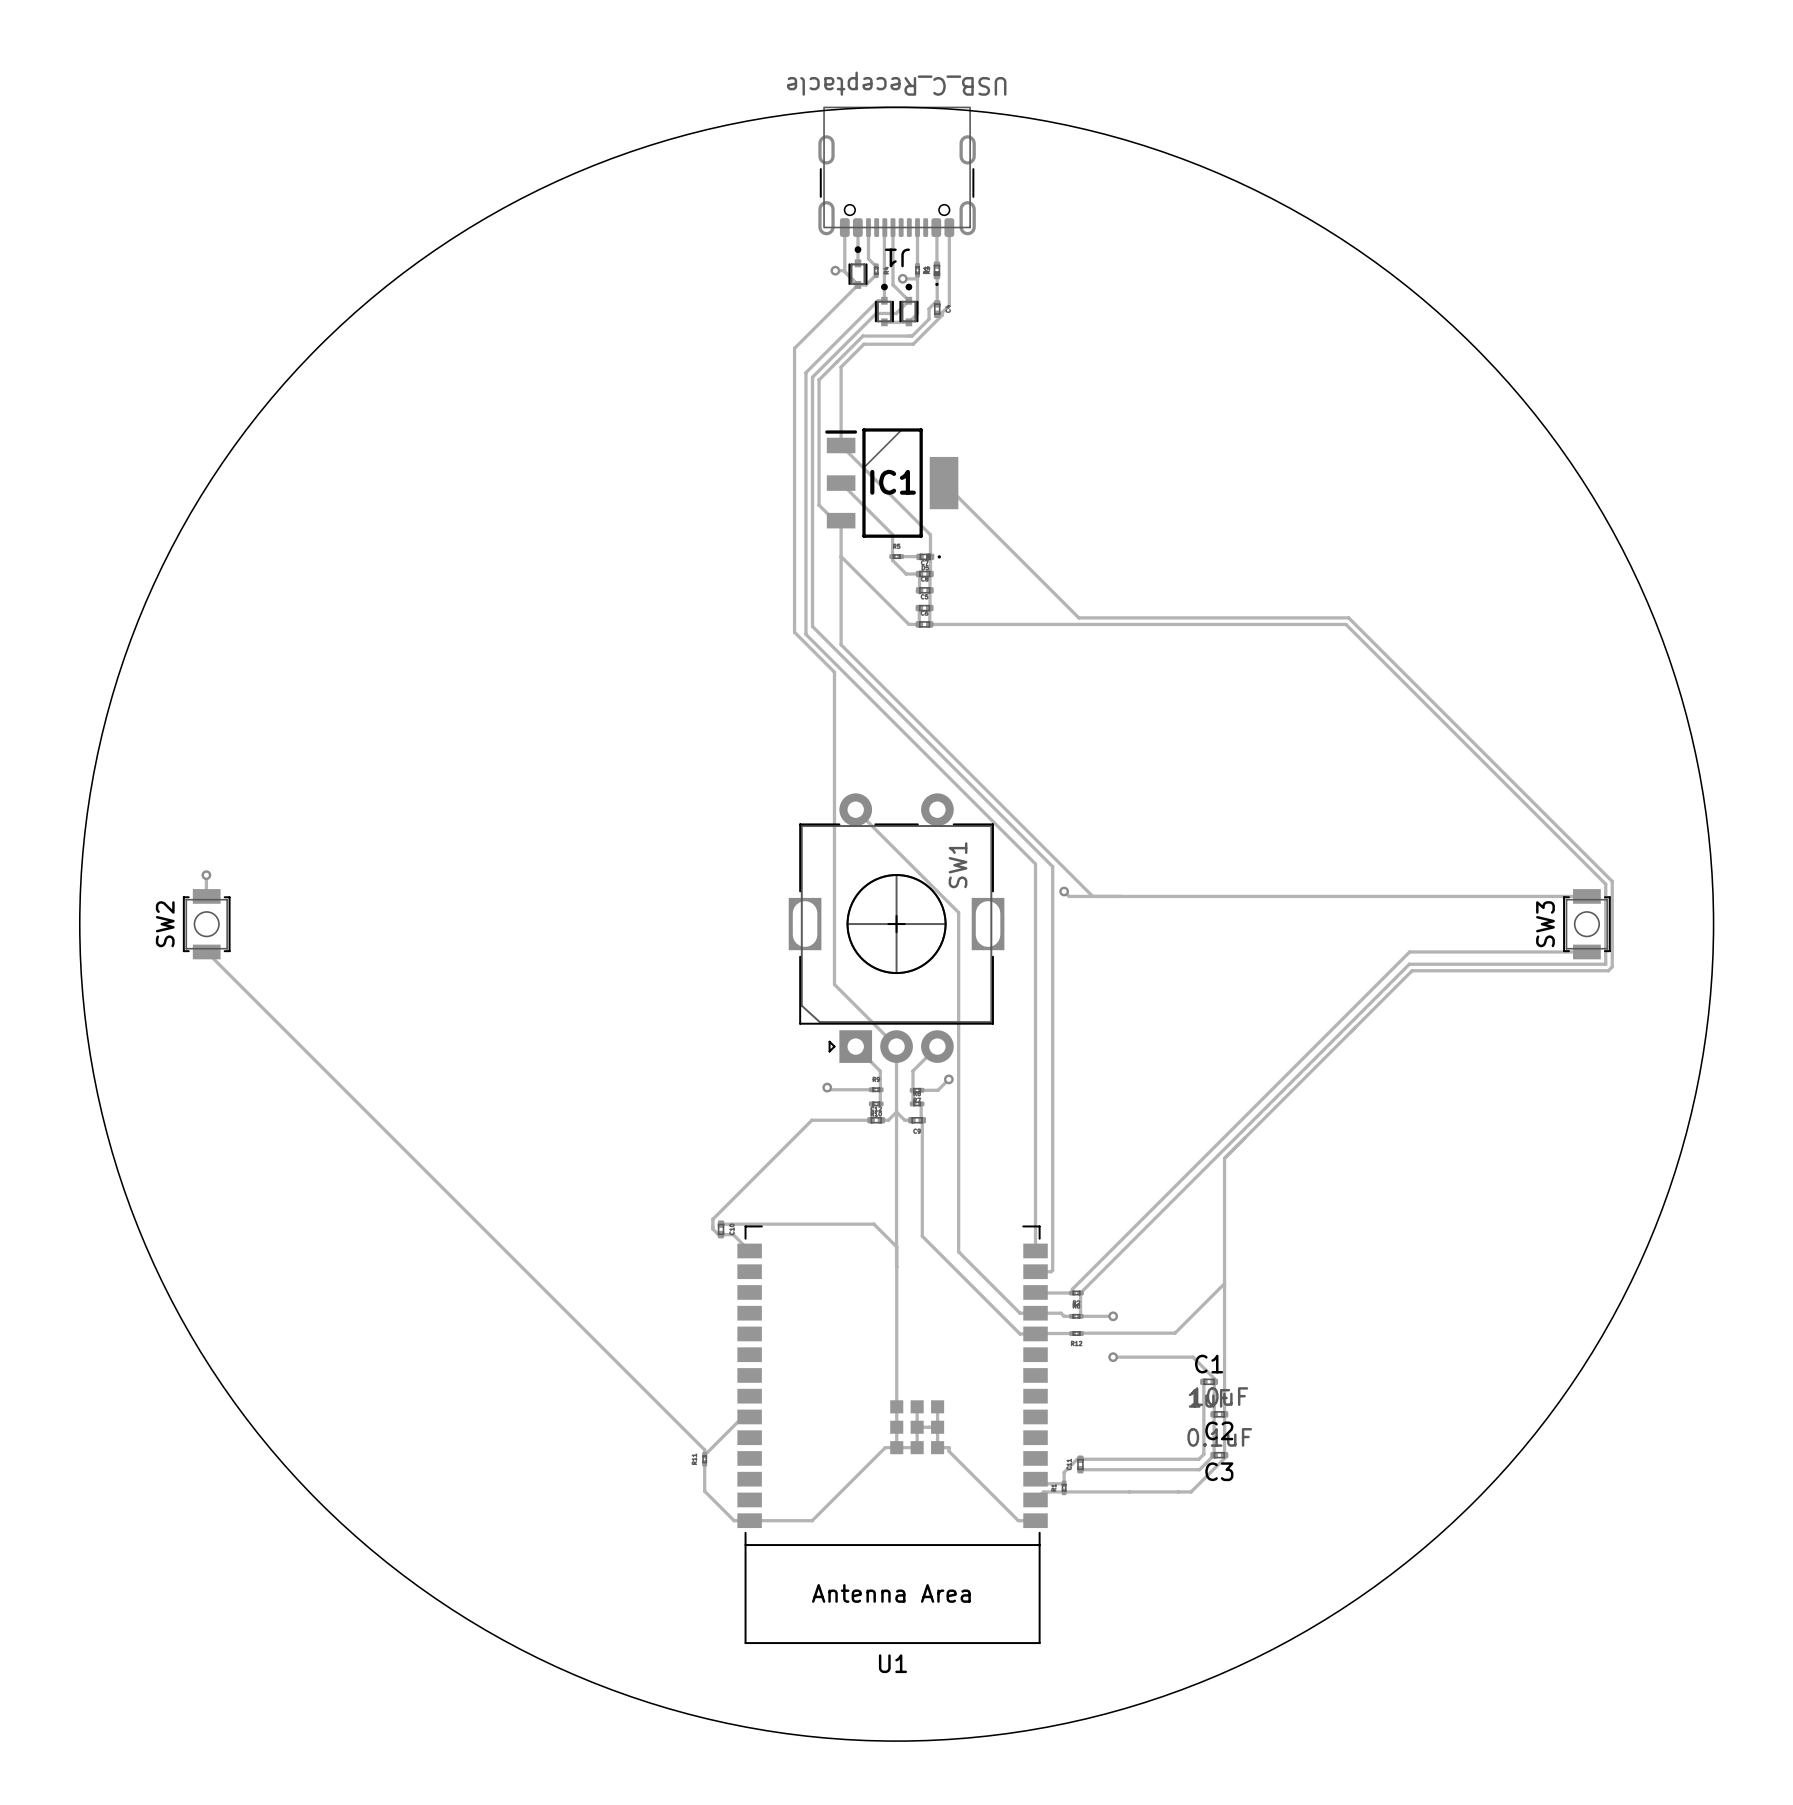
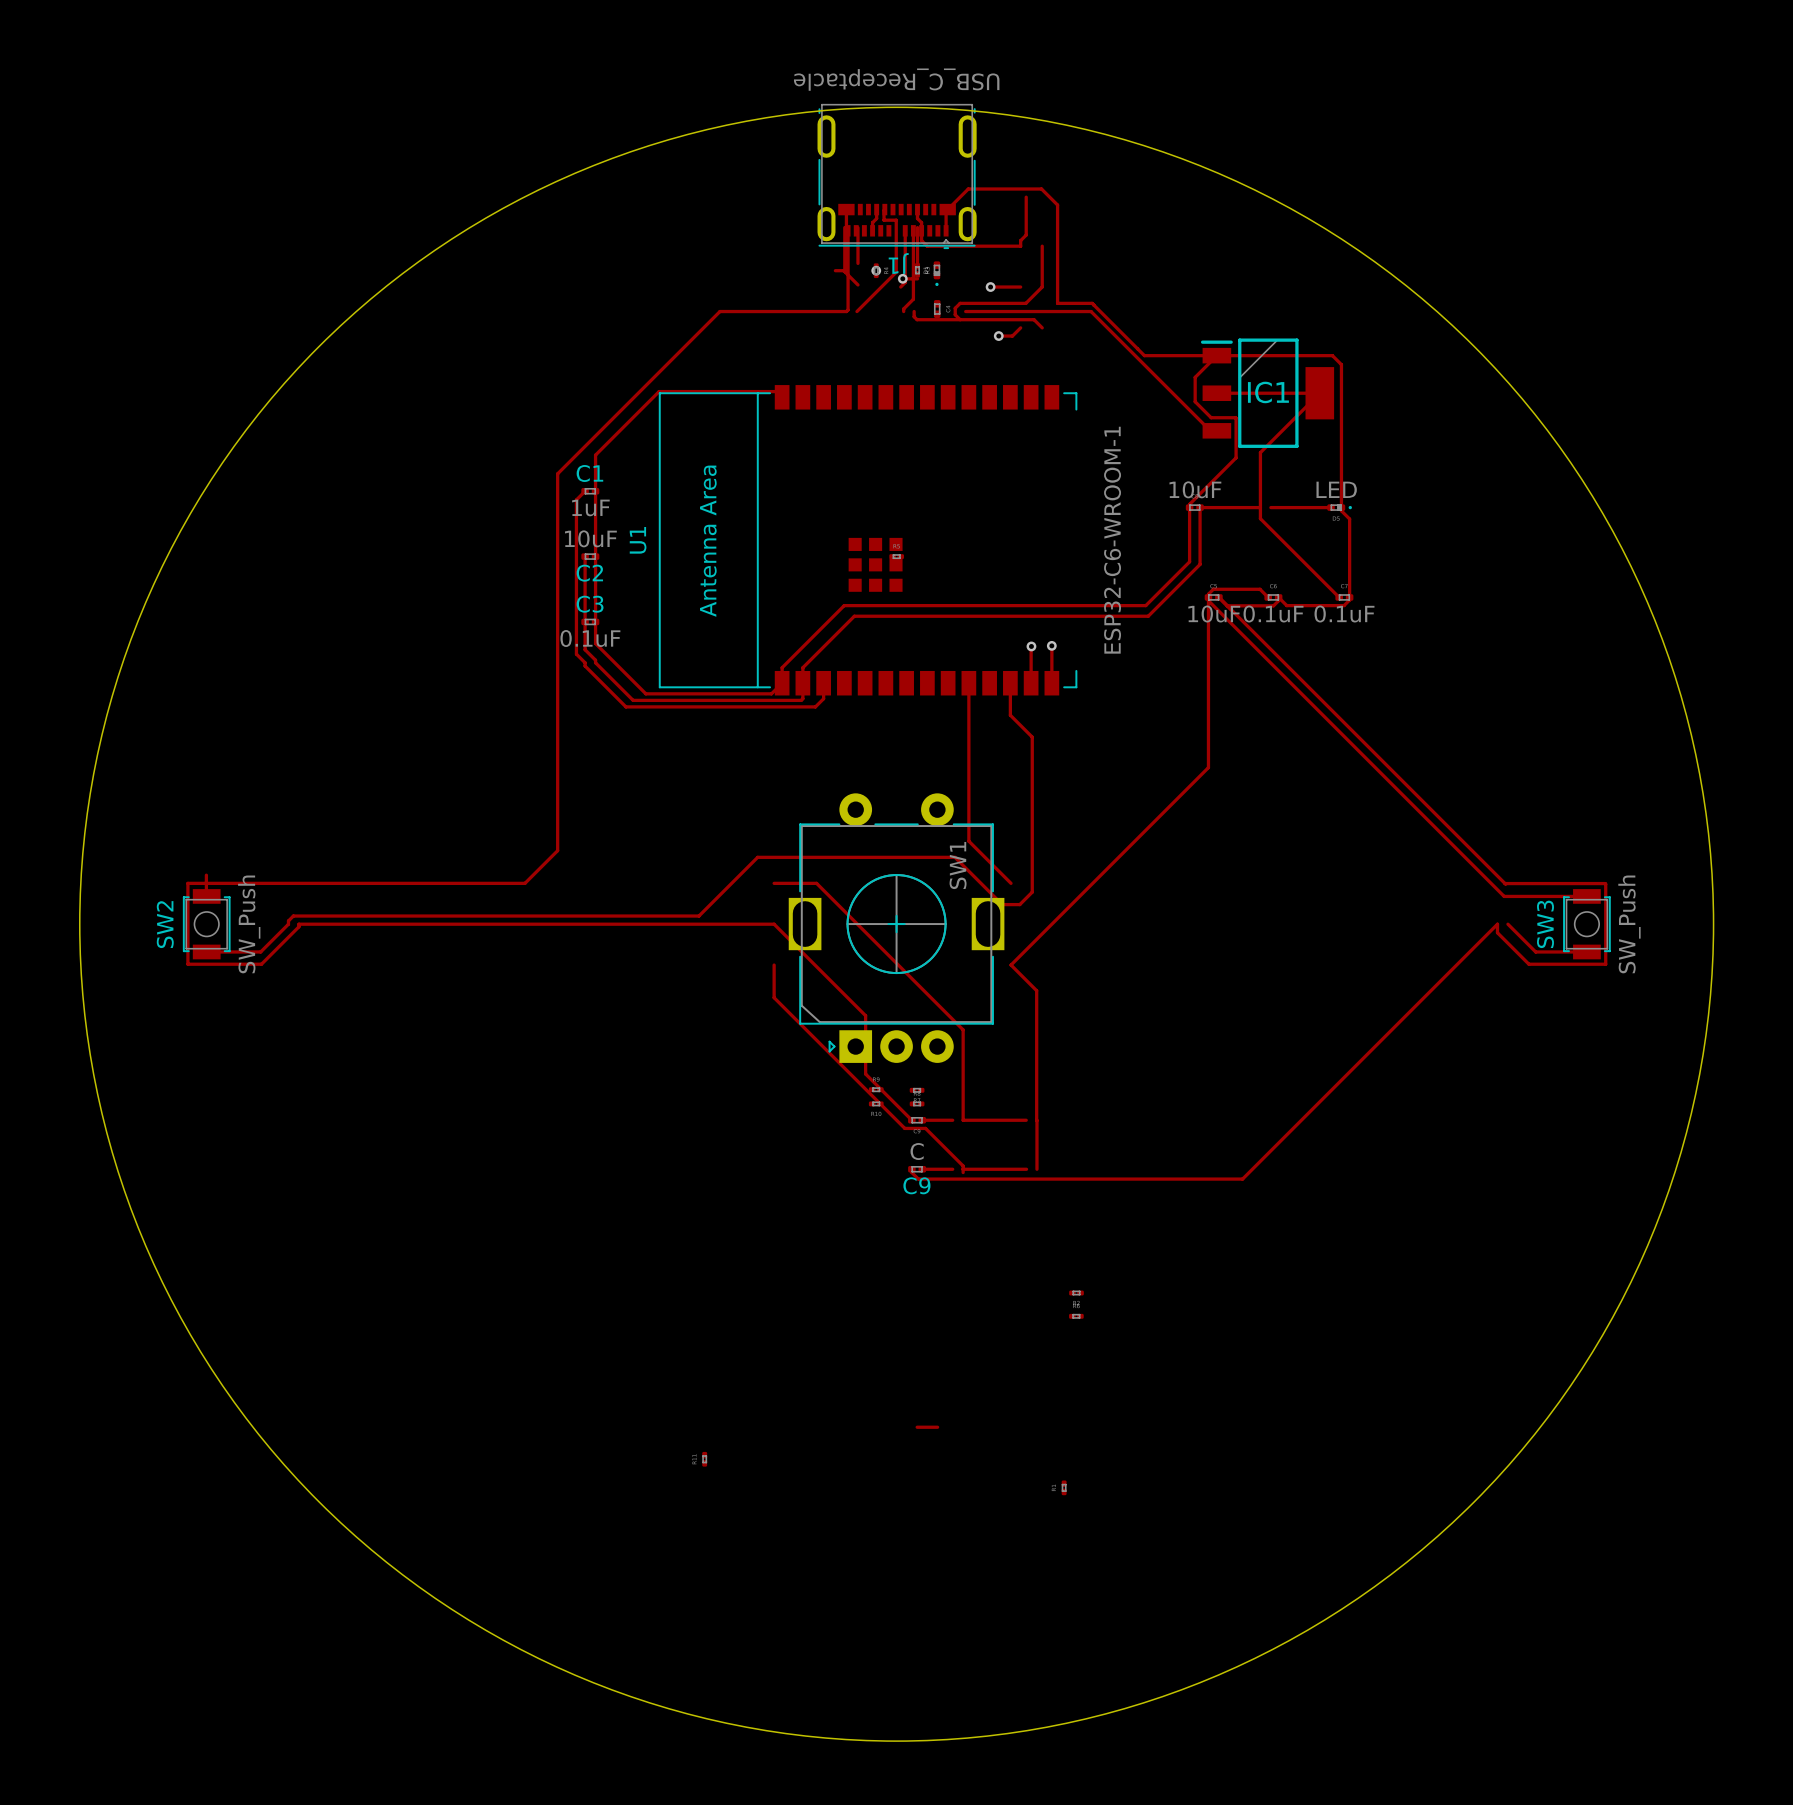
J1 footprint: [818, 106, 976, 237] -> [817, 103, 977, 250]
track: none -> (1026, 197) (1026, 235) (1020, 240) (1020, 246) (927, 246) (921, 240) (921, 222) (917, 218) (917, 209)
track: none -> (876, 209) (876, 218) (872, 222) (872, 230)
track: none -> (884, 209) (884, 220) (896, 220) (896, 272) (856, 311)
track: (868, 227) (868, 258) (876, 266) -> none
track: (884, 227) (884, 300) (877, 300) (805, 372) (805, 634) (1035, 864) (1035, 1250) -> none
track: (892, 227) (892, 284) (908, 300) (896, 313) (876, 313) (812, 377) (812, 626) (1052, 866) (1052, 1270) (1035, 1271) -> none
track: (936, 227) (936, 265) -> none
track: (949, 227) (949, 305) (940, 314) (937, 314) -> none
track: none -> (905, 230) (905, 282) (900, 287)
track: none -> (913, 230) (913, 299) (903, 308) (903, 311)
track: none -> (946, 230) (946, 211) (968, 189) (1041, 189) (1057, 205) (1057, 303) (1092, 303) (1144, 355) (1332, 355) (1341, 364) (1341, 510) (1349, 519) (1349, 600) (1344, 605) (1286, 605) (1278, 597) (1278, 600) (1273, 605) (1227, 605)
track: none -> (1042, 246) (1042, 287) (1025, 303) (960, 303) (955, 308) (955, 314) (960, 319)
part: (857, 267) -> none
via position: (835, 270) -> (876, 270)
track: (876, 274) (866, 284) (857, 284) (794, 348) (794, 632) (834, 672) (834, 984) -> (846, 209) (846, 229) (848, 230) (848, 309) (846, 311) (719, 311) (557, 473) (557, 850) (524, 883) (187, 883) (187, 964) (261, 964) (298, 926) (298, 924) (774, 924) (834, 984)
track: (917, 274) (917, 313) (908, 322) (884, 322) -> none
track: (936, 275) (937, 303) (933, 303) (929, 308) (929, 319) (912, 336) (862, 336) (819, 379) (819, 505) (834, 520) (841, 520) (841, 644) (1092, 896) -> none
track: none -> (990, 287) (1020, 287)
via: none -> (990, 287)
part: (884, 305) -> none
part: (908, 305) -> none
track: none -> (914, 311) (914, 316) (917, 319) (1034, 319) (1042, 327)
track: none -> (965, 311) (1091, 311) (1210, 430) (1216, 430)
track: (942, 312) (942, 315) (913, 344) (864, 344) (841, 367) (841, 445) (930, 534) (930, 607) -> none
track: none -> (1020, 327) (1012, 336) (998, 336)
via: none -> (998, 336)
track: none -> (1216, 355) (1195, 377) (1195, 401) (1211, 417) (1236, 418) (1236, 457) (1189, 504) (1189, 561) (1145, 605) (844, 605) (782, 667) (782, 683) (771, 693) (645, 693) (595, 643) (595, 455) (659, 391) (776, 391) (782, 397)
track: none -> (1216, 393) (1319, 393) (1260, 452) (1260, 518) (1339, 597)
track: (841, 483) (892, 534) (892, 560) (906, 574) (919, 574) -> none
IC1 position: (891, 483) -> (1267, 393)
track: (944, 483) (1078, 617) (1348, 617) (1612, 881) (1612, 966) (1608, 970) (1412, 970) (1224, 1158) (1224, 1458) (1191, 1491) (1043, 1491) (1035, 1499) -> none
part value: none -> 10uF (1195, 489)
part value: none -> LED (1336, 489)
track: none -> (585, 491) (576, 499) (576, 654) (585, 662) (585, 666) (625, 706) (815, 706) (823, 698) (823, 683)
track: none -> (1260, 507) (1200, 507) (1200, 564) (1148, 616) (854, 616) (802, 667) (802, 698) (801, 700) (633, 700) (585, 649) (585, 556)
track: none -> (1270, 507) (1331, 507)
U1 value: none -> ESP32-C6-WROOM-1 (1112, 540)
track: (841, 556) (908, 624) (919, 624) (919, 608) -> none
track: (900, 556) (920, 556) -> none
part position: (928, 556) -> (1339, 507)
track: (919, 574) (919, 592) -> none
part position: (924, 574) -> (1344, 597)
part position: (924, 590) -> (1194, 507)
track: none -> (1218, 597) (1505, 884)
track: none -> (1268, 597) (1260, 589) (1213, 589) (1208, 594) (1208, 767) (1011, 965) (1036, 990) (1036, 1169)
part position: (924, 608) -> (1213, 597)
track: (929, 608) (929, 624) (1345, 624) (1605, 883) -> (1505, 883) (1605, 883)
part value: none -> 10uF (1214, 614)
part value: none -> 0.1uF (1273, 614)
part value: none -> 0.1uF (1344, 614)
part position: (924, 624) -> (1273, 597)
track: none -> (1051, 645) (1051, 683)
via: none -> (1051, 645)
track: none -> (1031, 646) (1031, 683)
via: none -> (1031, 646)
track: none -> (968, 683) (968, 841) (1011, 883)
track: (855, 809) (958, 912) (958, 1251) (1020, 1313) (1061, 1313) (1064, 1316) (1072, 1316) -> none
via: (206, 875) -> none
track: none -> (774, 883) (816, 883) (963, 1029) (963, 1120) (1026, 1120)
track: (1064, 891) (1069, 896) (1504, 896) -> (1208, 600) (1504, 896)
via: (1064, 891) -> none
SW2 value: none -> SW_Push (249, 924)
SW3 value: none -> SW_Push (1629, 924)
track: (206, 951) (704, 1449) (704, 1455) (742, 1416) (749, 1416) -> (206, 951) (260, 951) (288, 924) (288, 920) (293, 916) (698, 916) (757, 857) (954, 857) (1002, 904) (1019, 904) (1032, 892) (1032, 737) (1010, 715) (1010, 683)
track: (1535, 951) (1409, 951) (1072, 1289) (1072, 1293) (1035, 1292) -> (1535, 951) (1507, 924)
track: (1528, 964) (1409, 964) (1080, 1293) (1080, 1316) -> (1528, 964) (1497, 932) (1497, 924) (1242, 1179) (918, 1179) (911, 1172) (911, 1169)
track: none -> (774, 965) (774, 997) (904, 1128) (925, 1128) (963, 1166) (963, 1172)
track: (865, 1015) (896, 1046) (896, 1267) -> none
track: (855, 1046) (880, 1071) (880, 1103) -> none
track: (937, 1046) (913, 1070) (913, 1103) -> none
track: (948, 1079) (937, 1090) (921, 1090) -> none
via: (948, 1079) -> none
track: (827, 1087) (829, 1089) (872, 1089) -> none
via: (827, 1087) -> none
track: (872, 1103) (871, 1120) (811, 1120) (712, 1219) (712, 1229) (718, 1234) (733, 1234) (749, 1250) -> none
track: (921, 1103) (922, 1236) (1020, 1333) (1072, 1333) -> none
part: (876, 1120) -> none
track: (881, 1120) (888, 1120) (896, 1112) (904, 1120) (911, 1120) -> (865, 1015) (865, 1074) (911, 1120)
track: none -> (922, 1120) (952, 1120)
C9: none -> C (917, 1169)
track: none -> (922, 1169) (952, 1169)
track: none -> (963, 1169) (1026, 1169)
track: (721, 1224) (873, 1224) (896, 1246) (896, 1447) -> none
part: (721, 1229) -> none
track: (1224, 1283) (1175, 1333) (1080, 1333) -> none
track: (1080, 1316) (1113, 1316) -> none
via: (1113, 1316) -> none
part: (1076, 1333) -> none
track: (1113, 1357) (1192, 1357) (1214, 1378) (1214, 1414) -> none
via: (1113, 1357) -> none
track: (1203, 1381) (1203, 1454) (1198, 1459) (1077, 1459) (1064, 1472) (1064, 1483) (1040, 1483) (1035, 1479) -> none
C1 position: (1209, 1381) -> (590, 491)
track: (917, 1406) (917, 1447) (885, 1447) (812, 1520) (734, 1520) (704, 1491) (704, 1463) -> none
track: (937, 1406) (937, 1447) (949, 1447) (949, 1451) (1018, 1520) (1035, 1520) -> none
track: (1214, 1414) (1214, 1455) (1199, 1469) (1080, 1469) -> none
C2 position: (1219, 1414) -> (590, 556)
U1 rotation: 0° (892, 1434) -> 90° clockwise (868, 540)
U1 position: (892, 1434) -> (868, 540)
C3 value position: 0.1uF (1219, 1437) -> 0.1uF (590, 638)
C3 position: (1219, 1455) -> (590, 621)
part: (1080, 1464) -> none
C3 name position: C3 (1219, 1471) -> C3 (590, 604)

